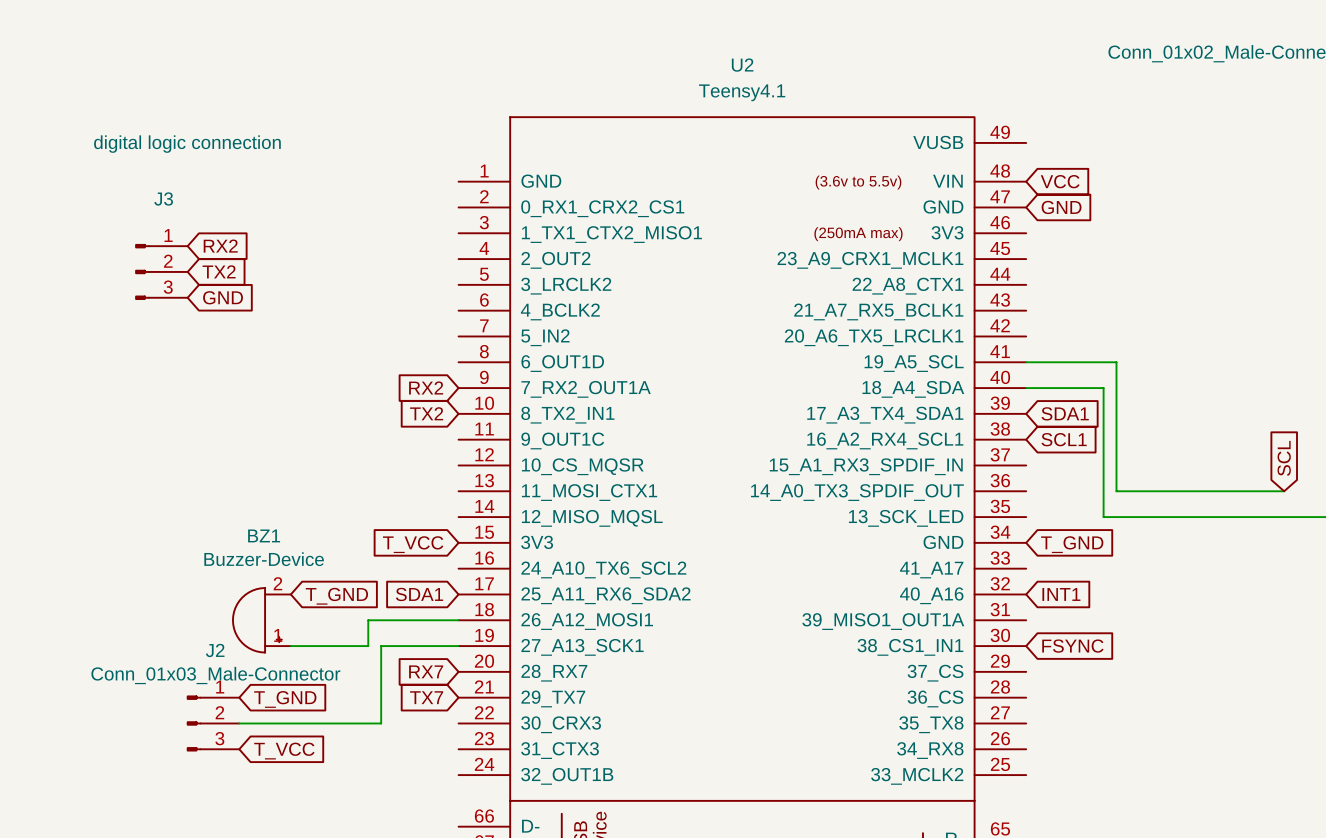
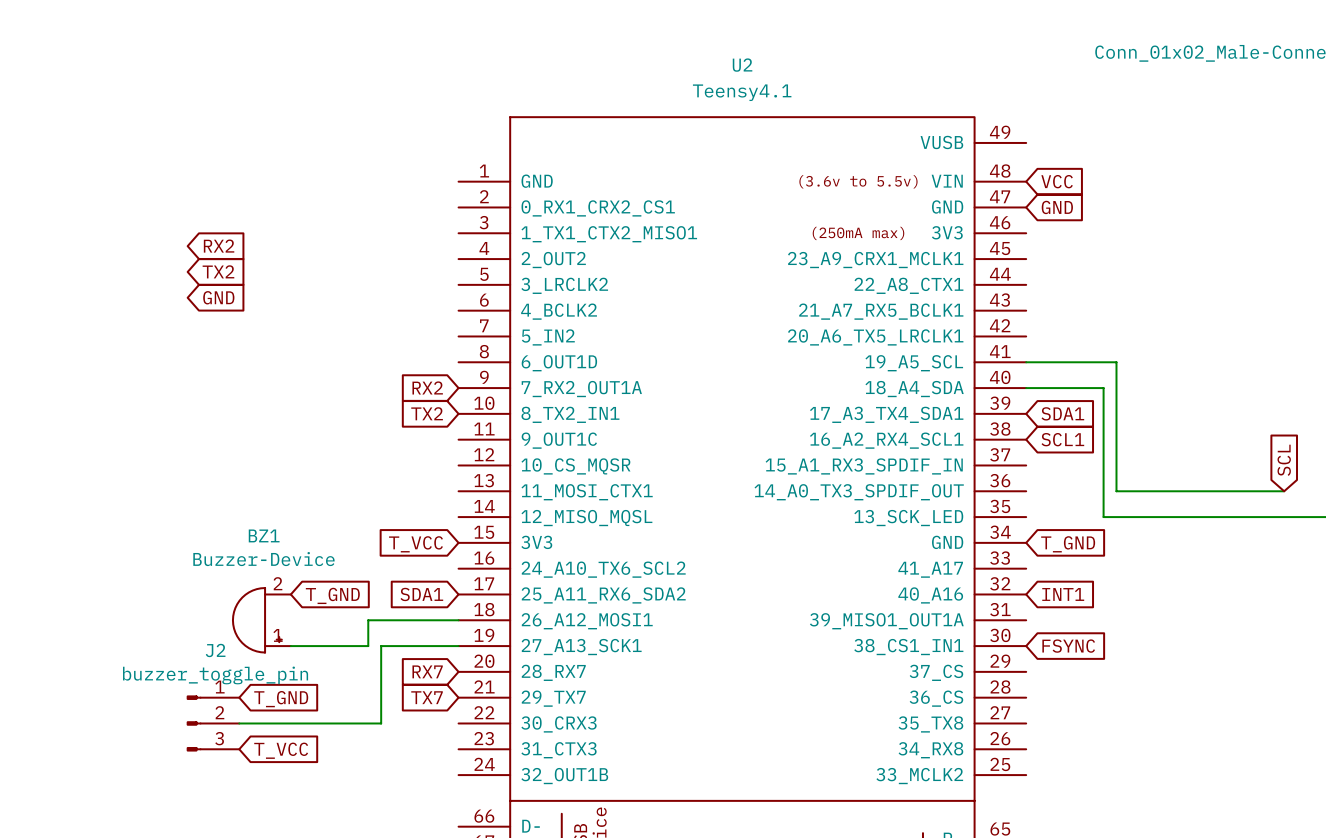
J3: digital logic connection (161, 271) -> none
J2 value: Conn_01x03_Male-Connector (215, 675) -> buzzer_toggle_pin (215, 675)

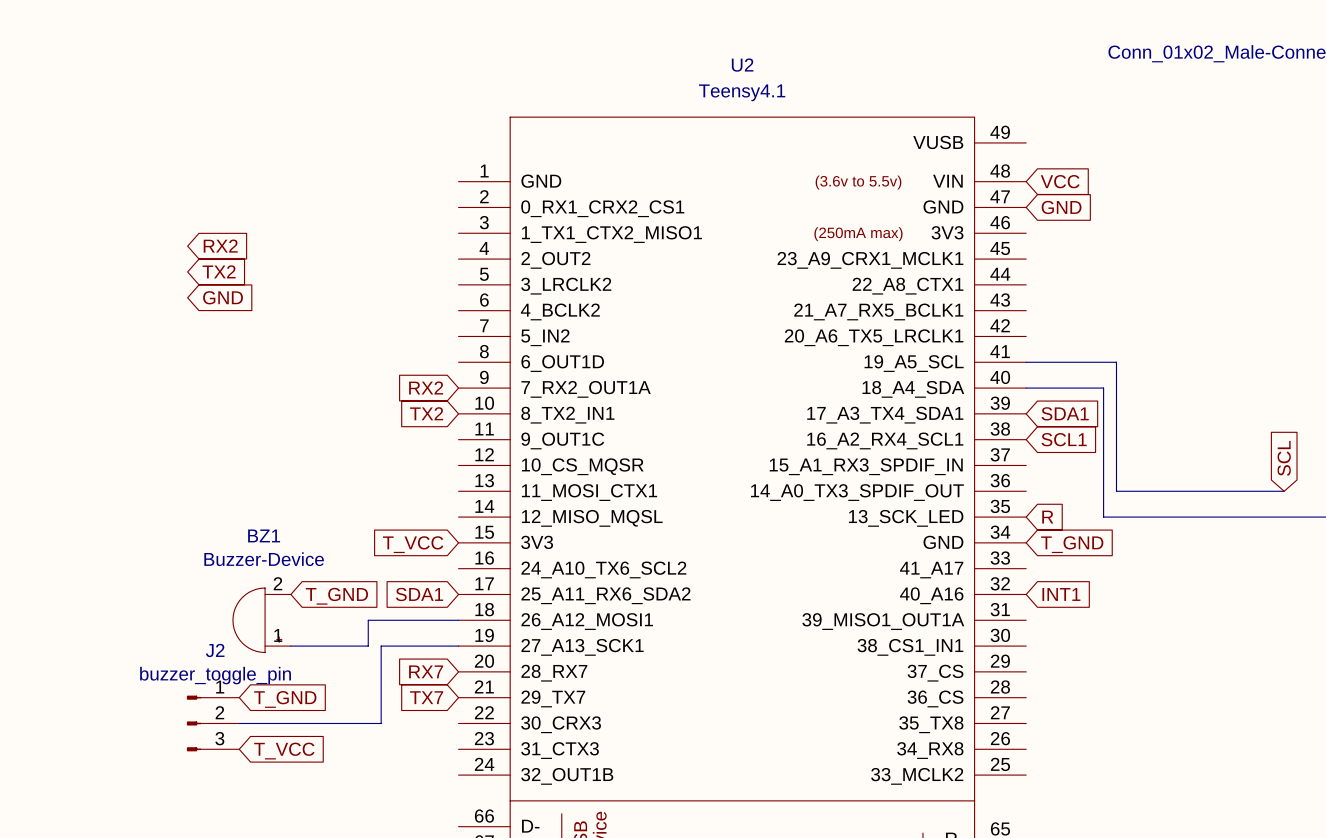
global label: none -> R (1047, 517)
global label: FSYNC (1068, 646) -> none

